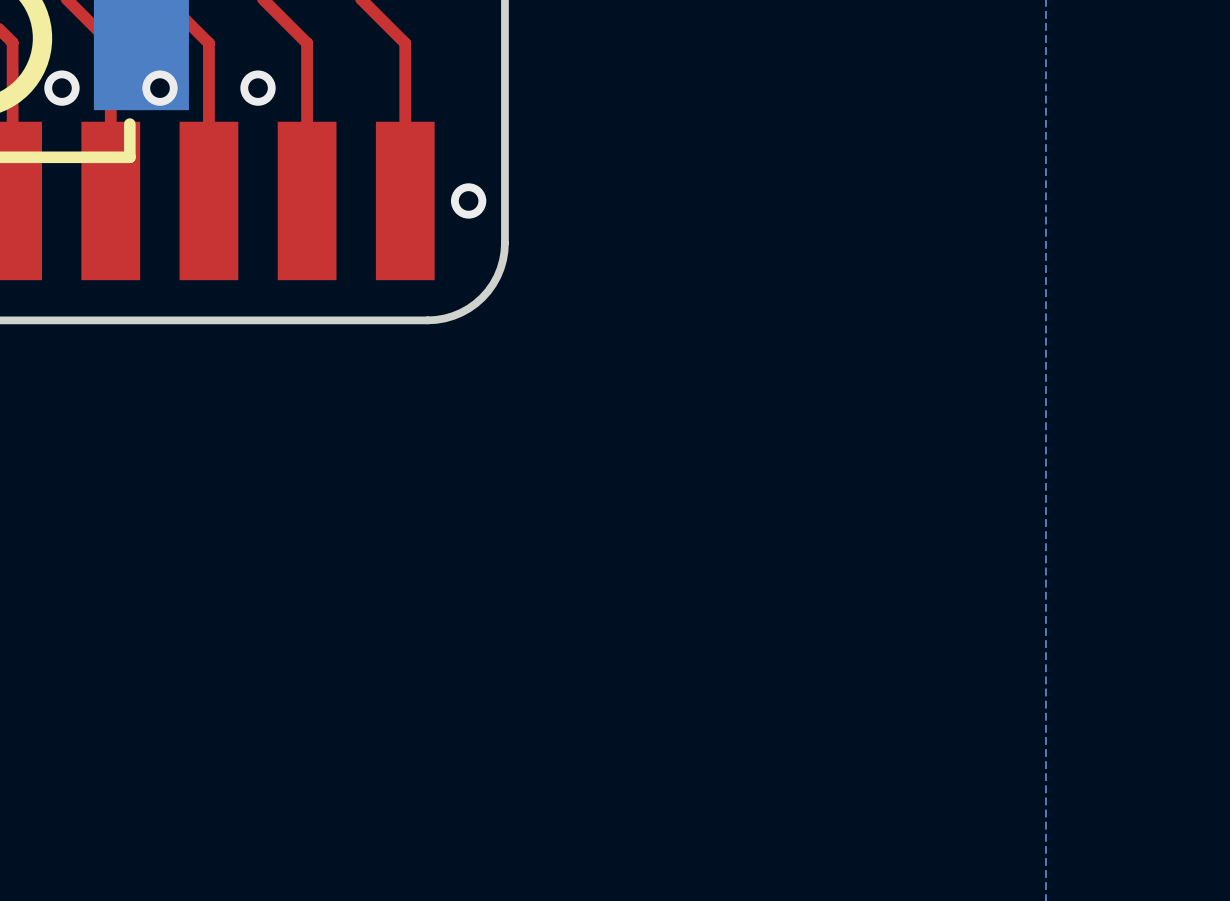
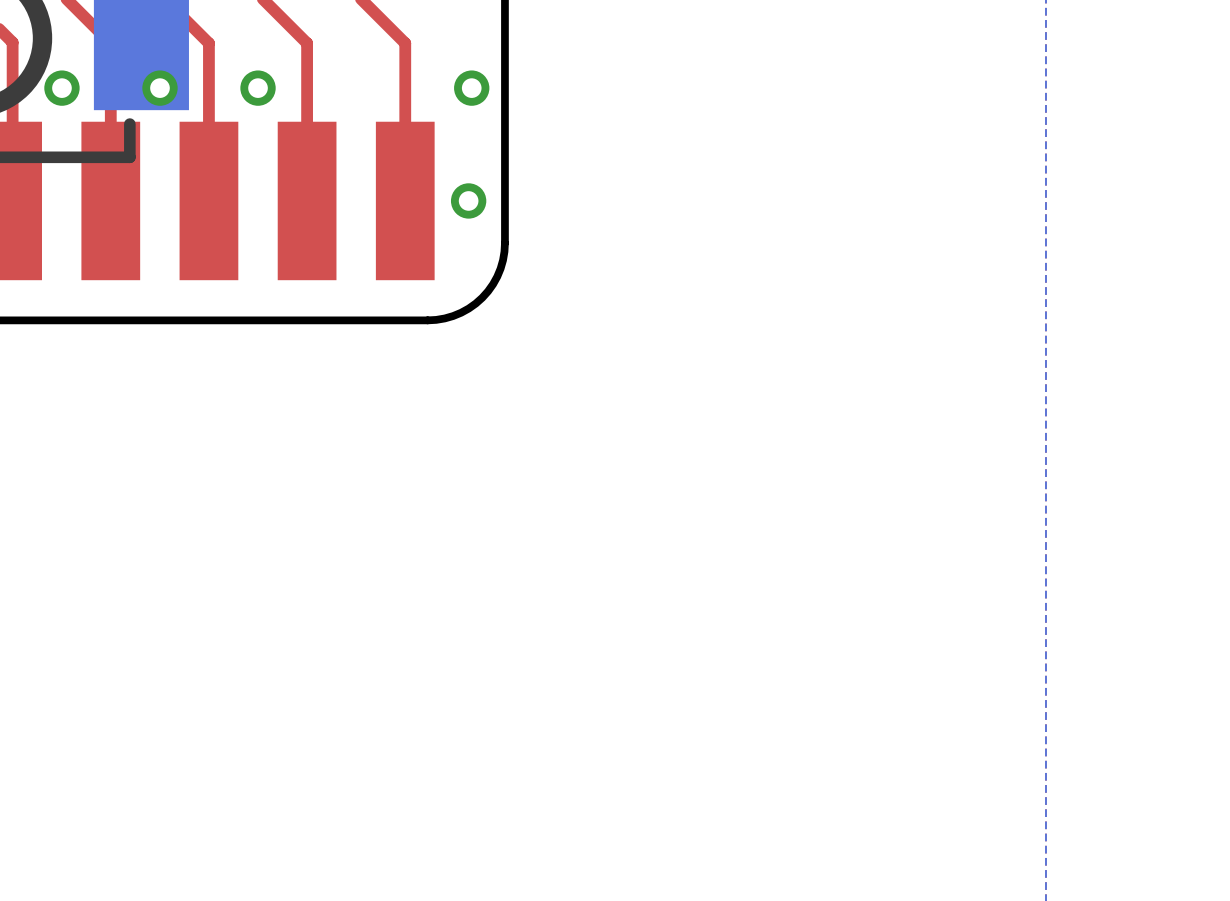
via: none -> (471, 88)

